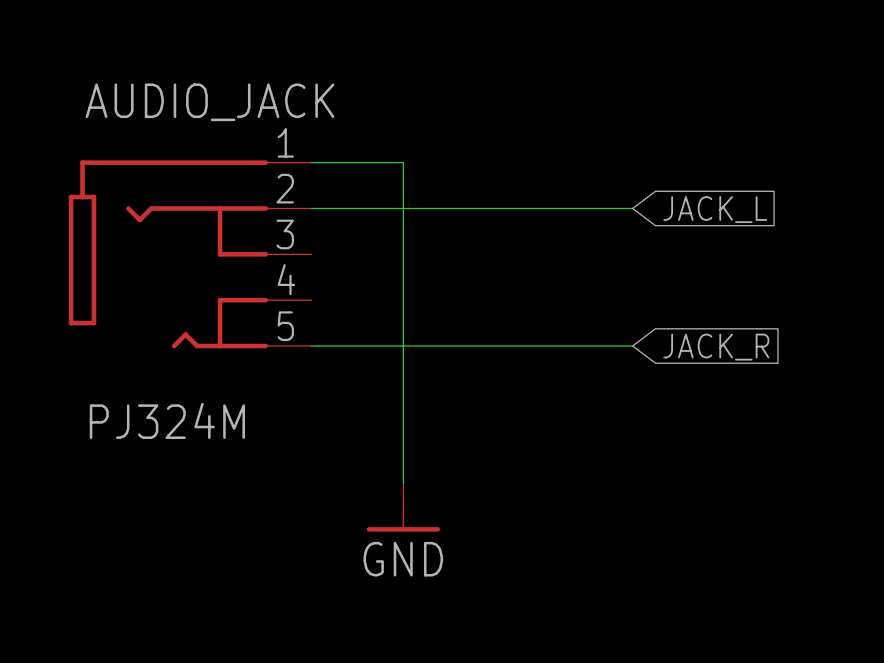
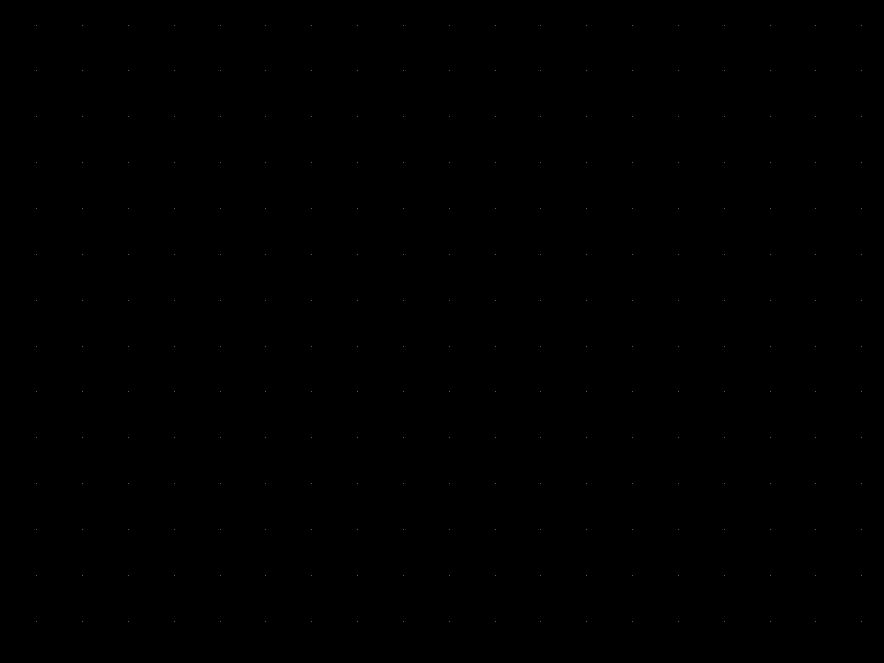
wire: (311, 162) (403, 162) (403, 483) -> none
wire: (311, 208) (632, 208) -> none
global label: JACK_L (715, 209) -> none
AUDIO_JACK: PJ324M (190, 254) -> none
wire: (311, 346) (632, 346) -> none
global label: JACK_R (716, 347) -> none
power symbol: GND (403, 507) -> none

